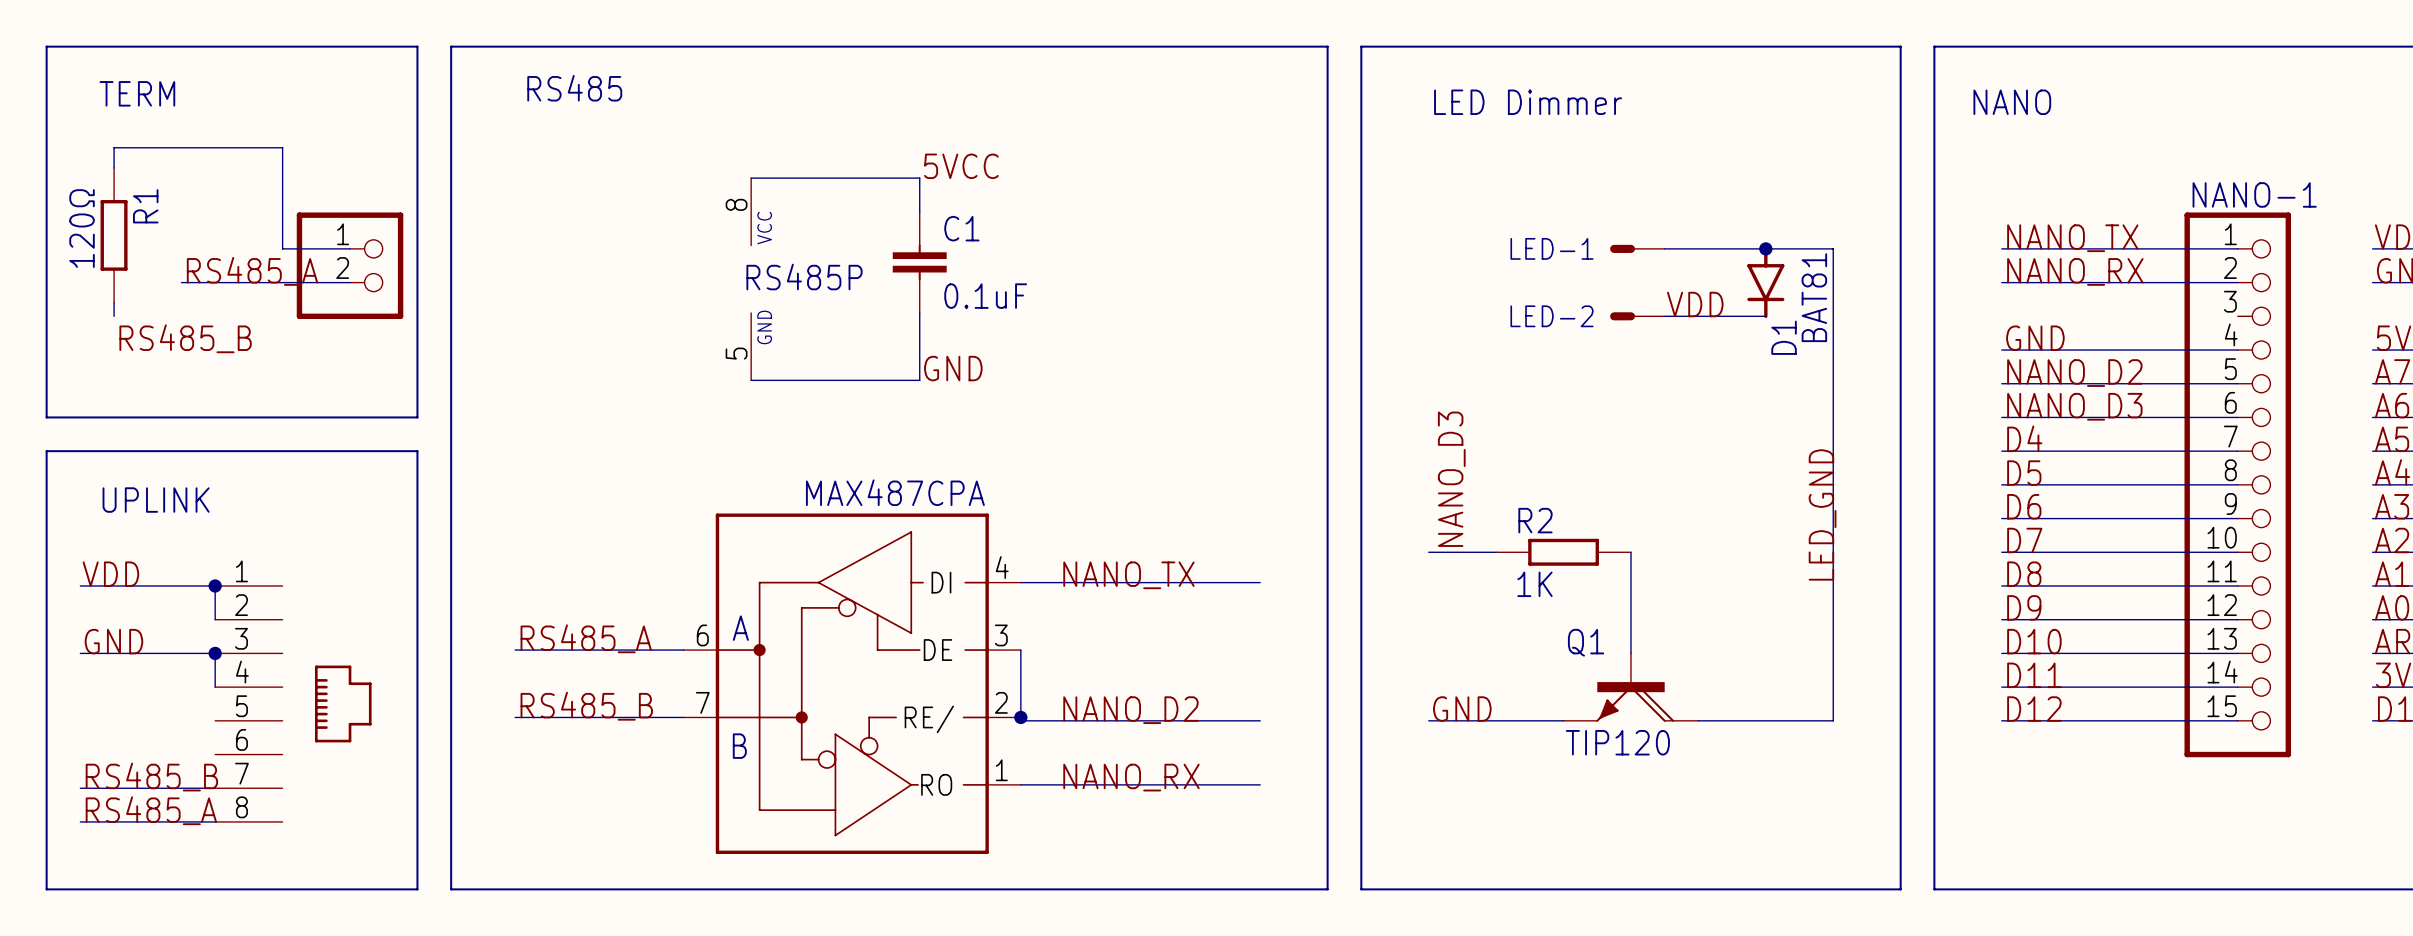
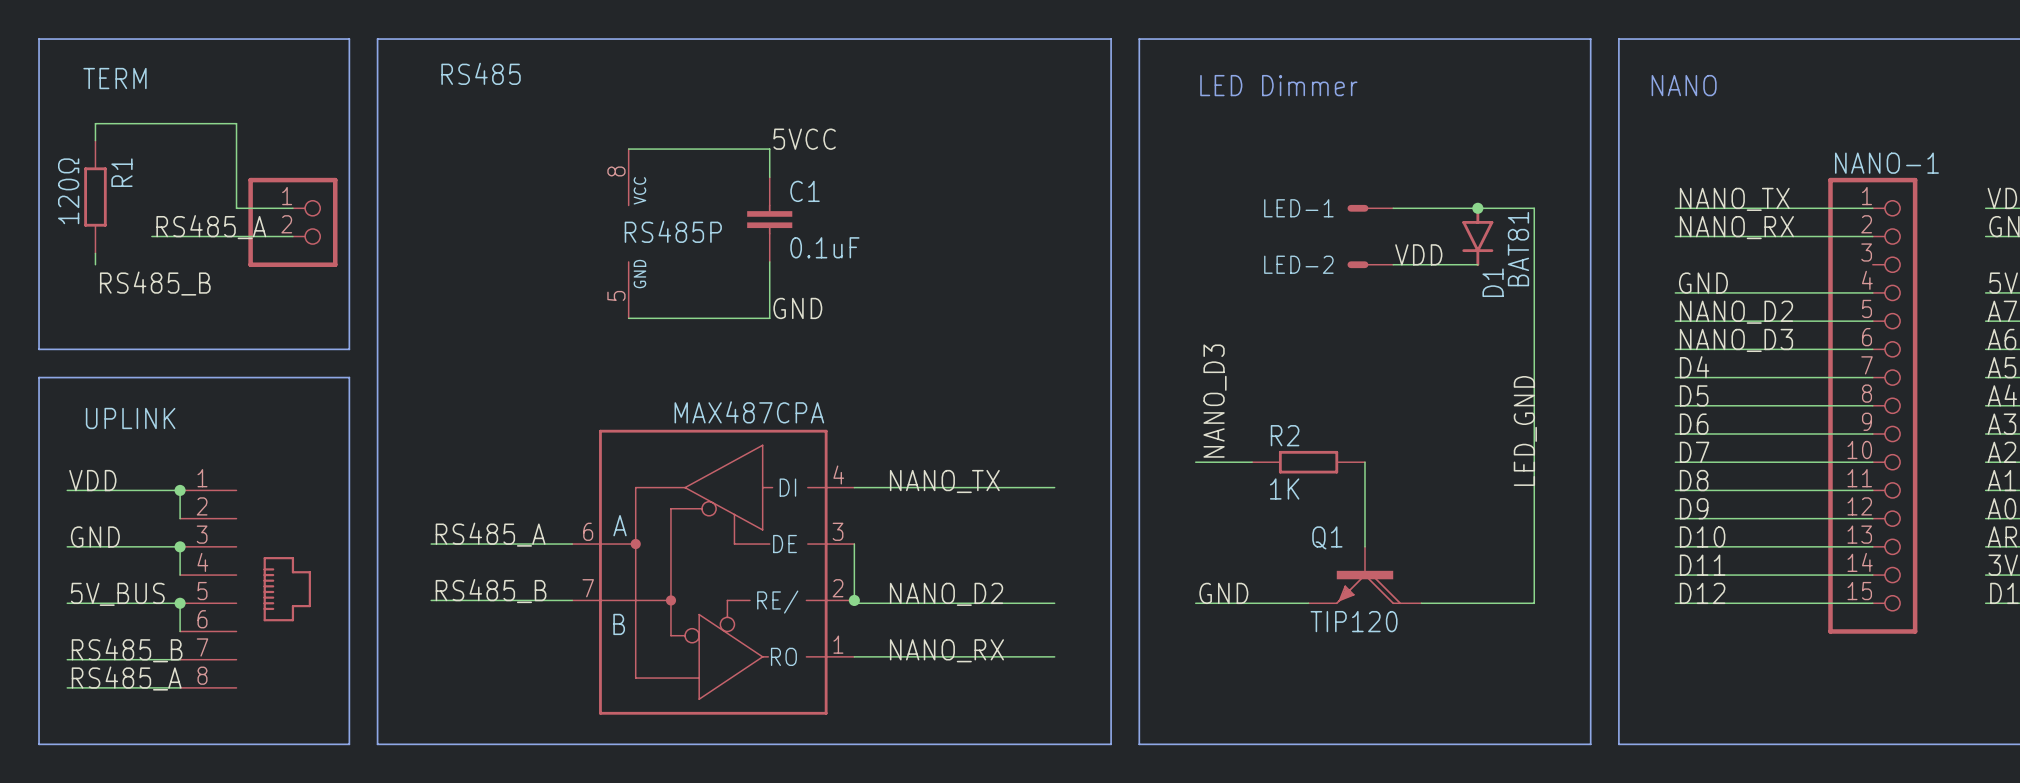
label: none -> 5V_BUS (117, 594)
wire: none -> (67, 603) (180, 603) (180, 631)
junction: none -> (180, 603)

